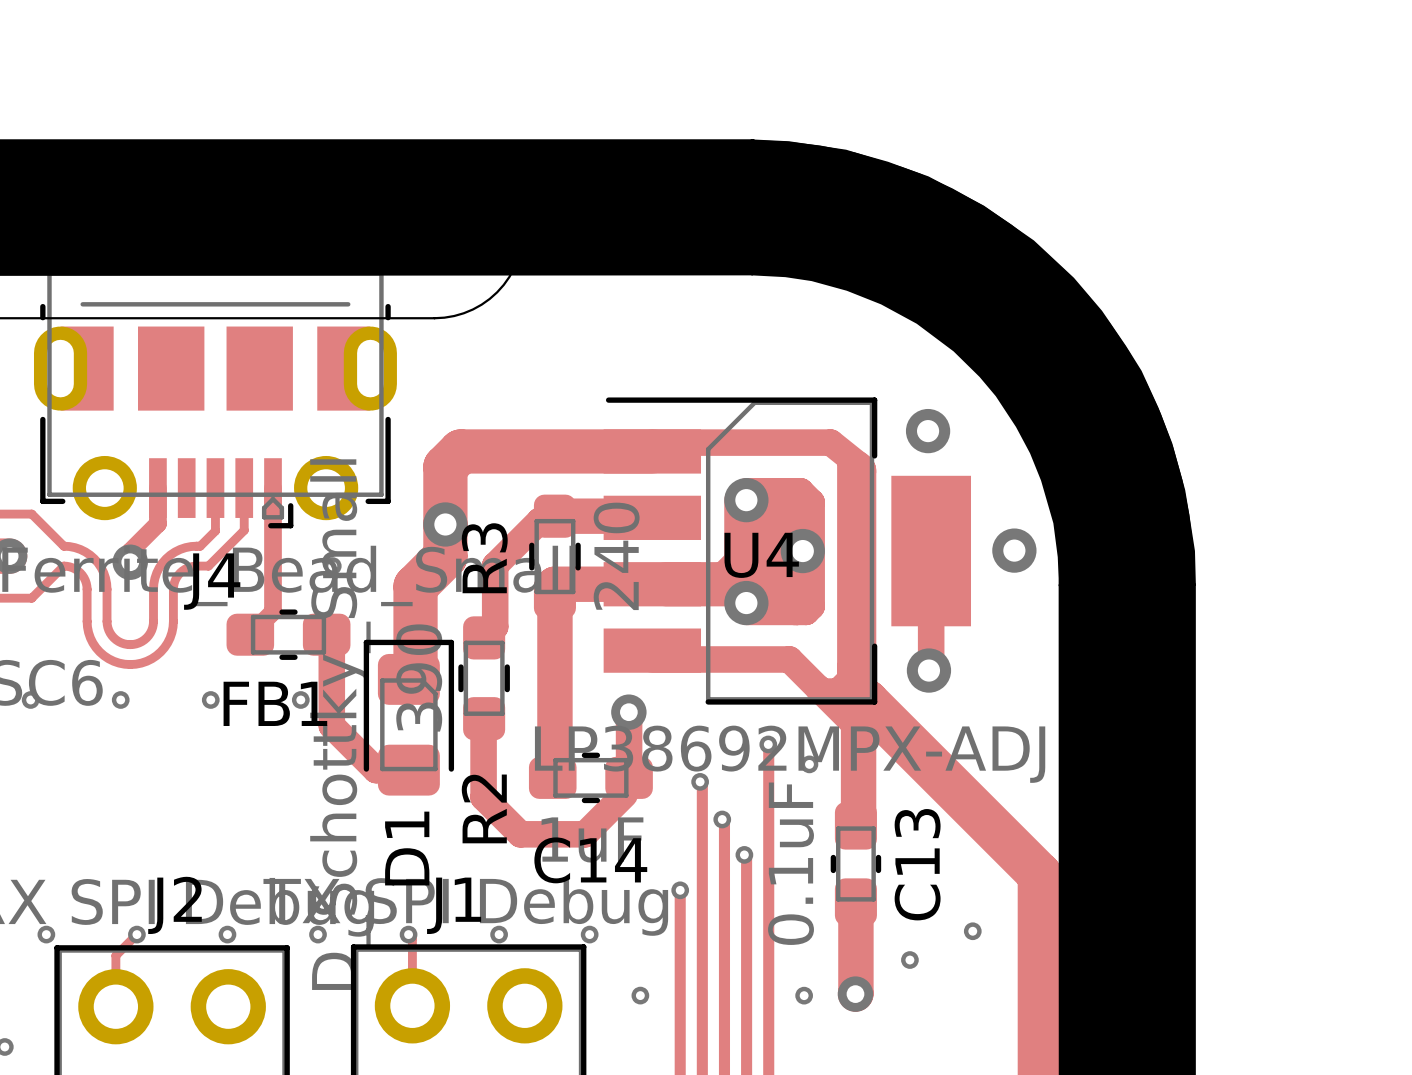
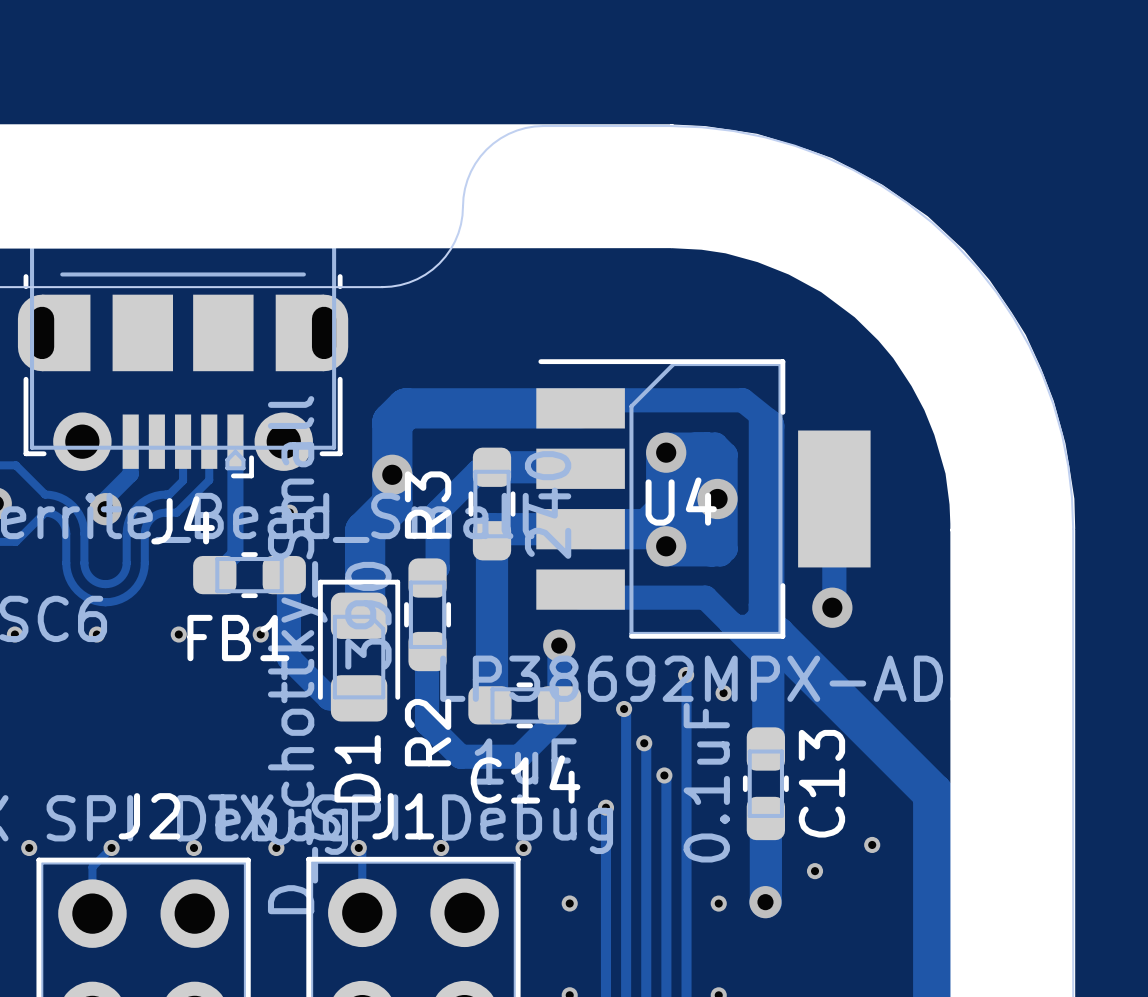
via: (928, 431) -> none
via: (1014, 550) -> none

